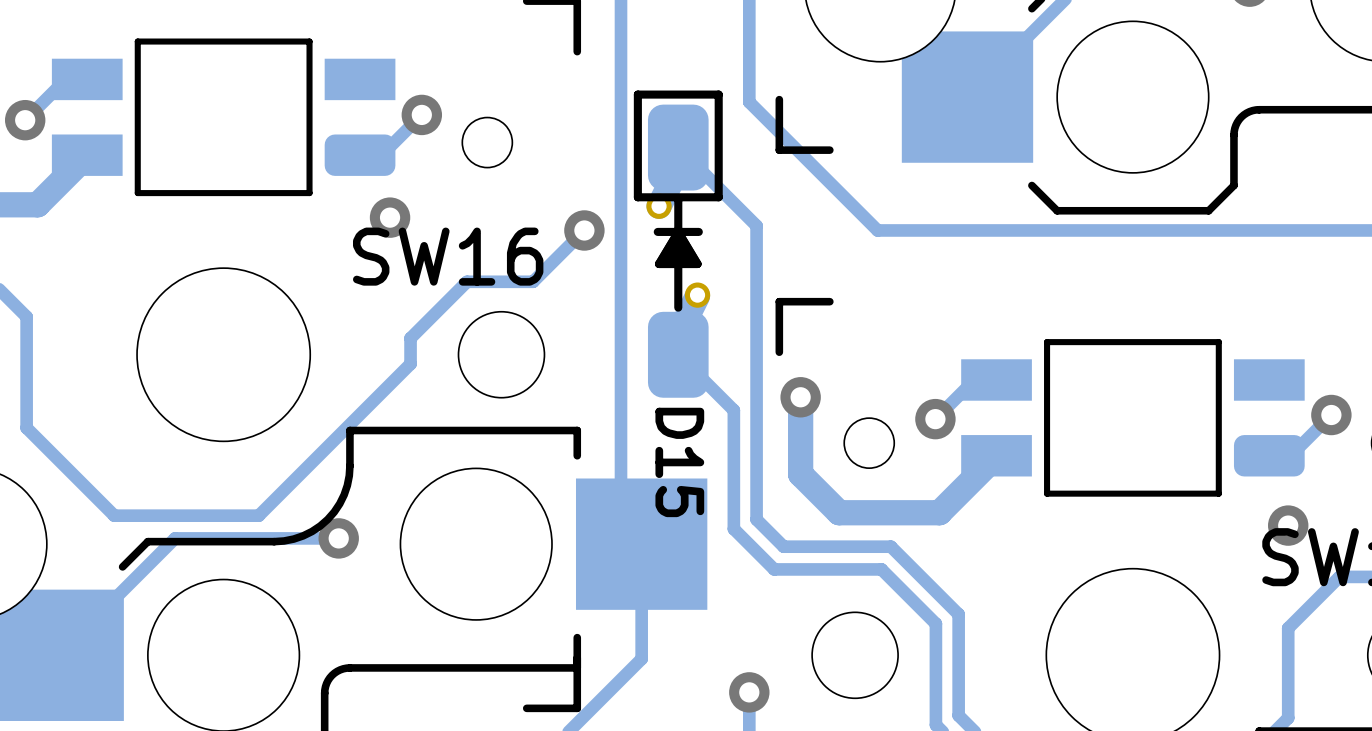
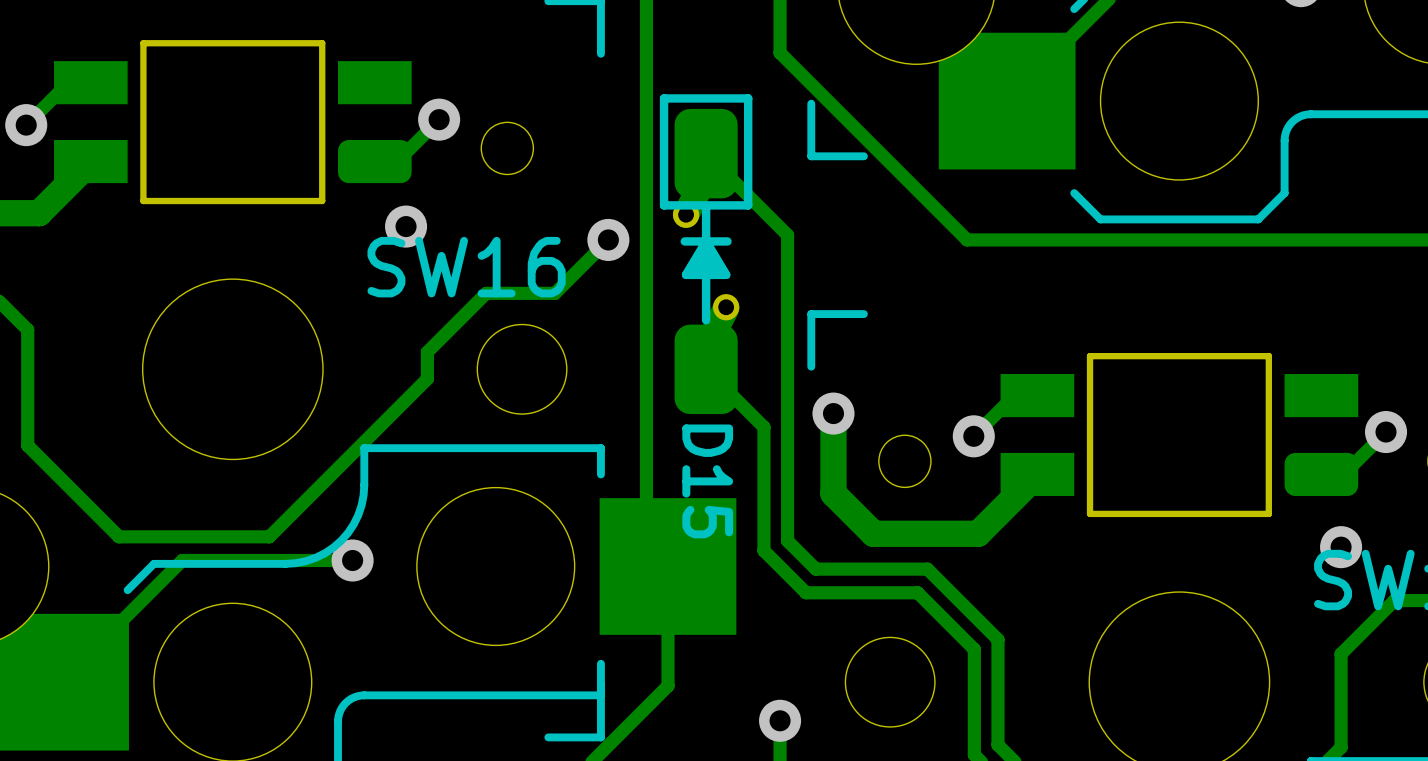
track: (749, 50) (749, 102) (877, 230) (928, 230) -> (780, 52) (967, 239)

